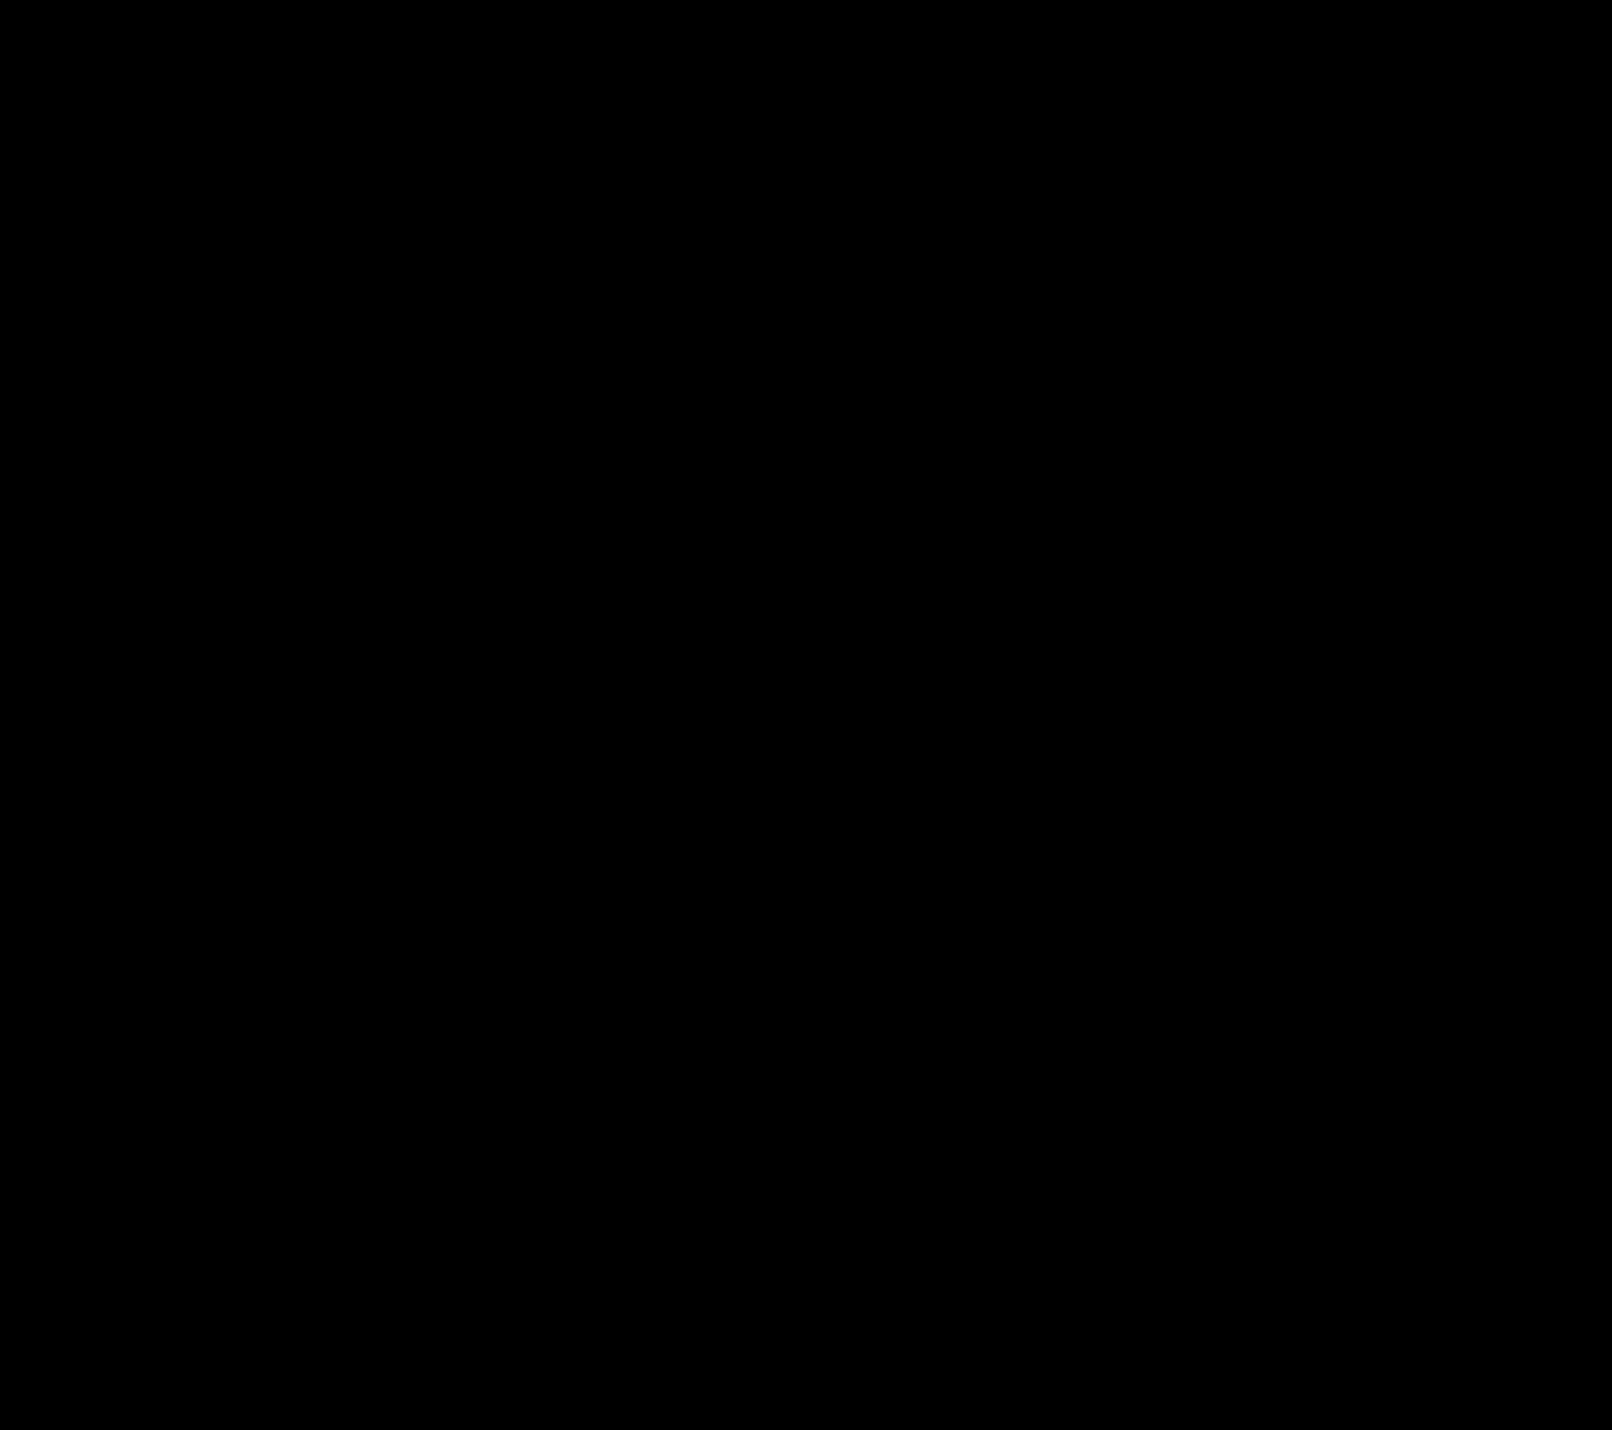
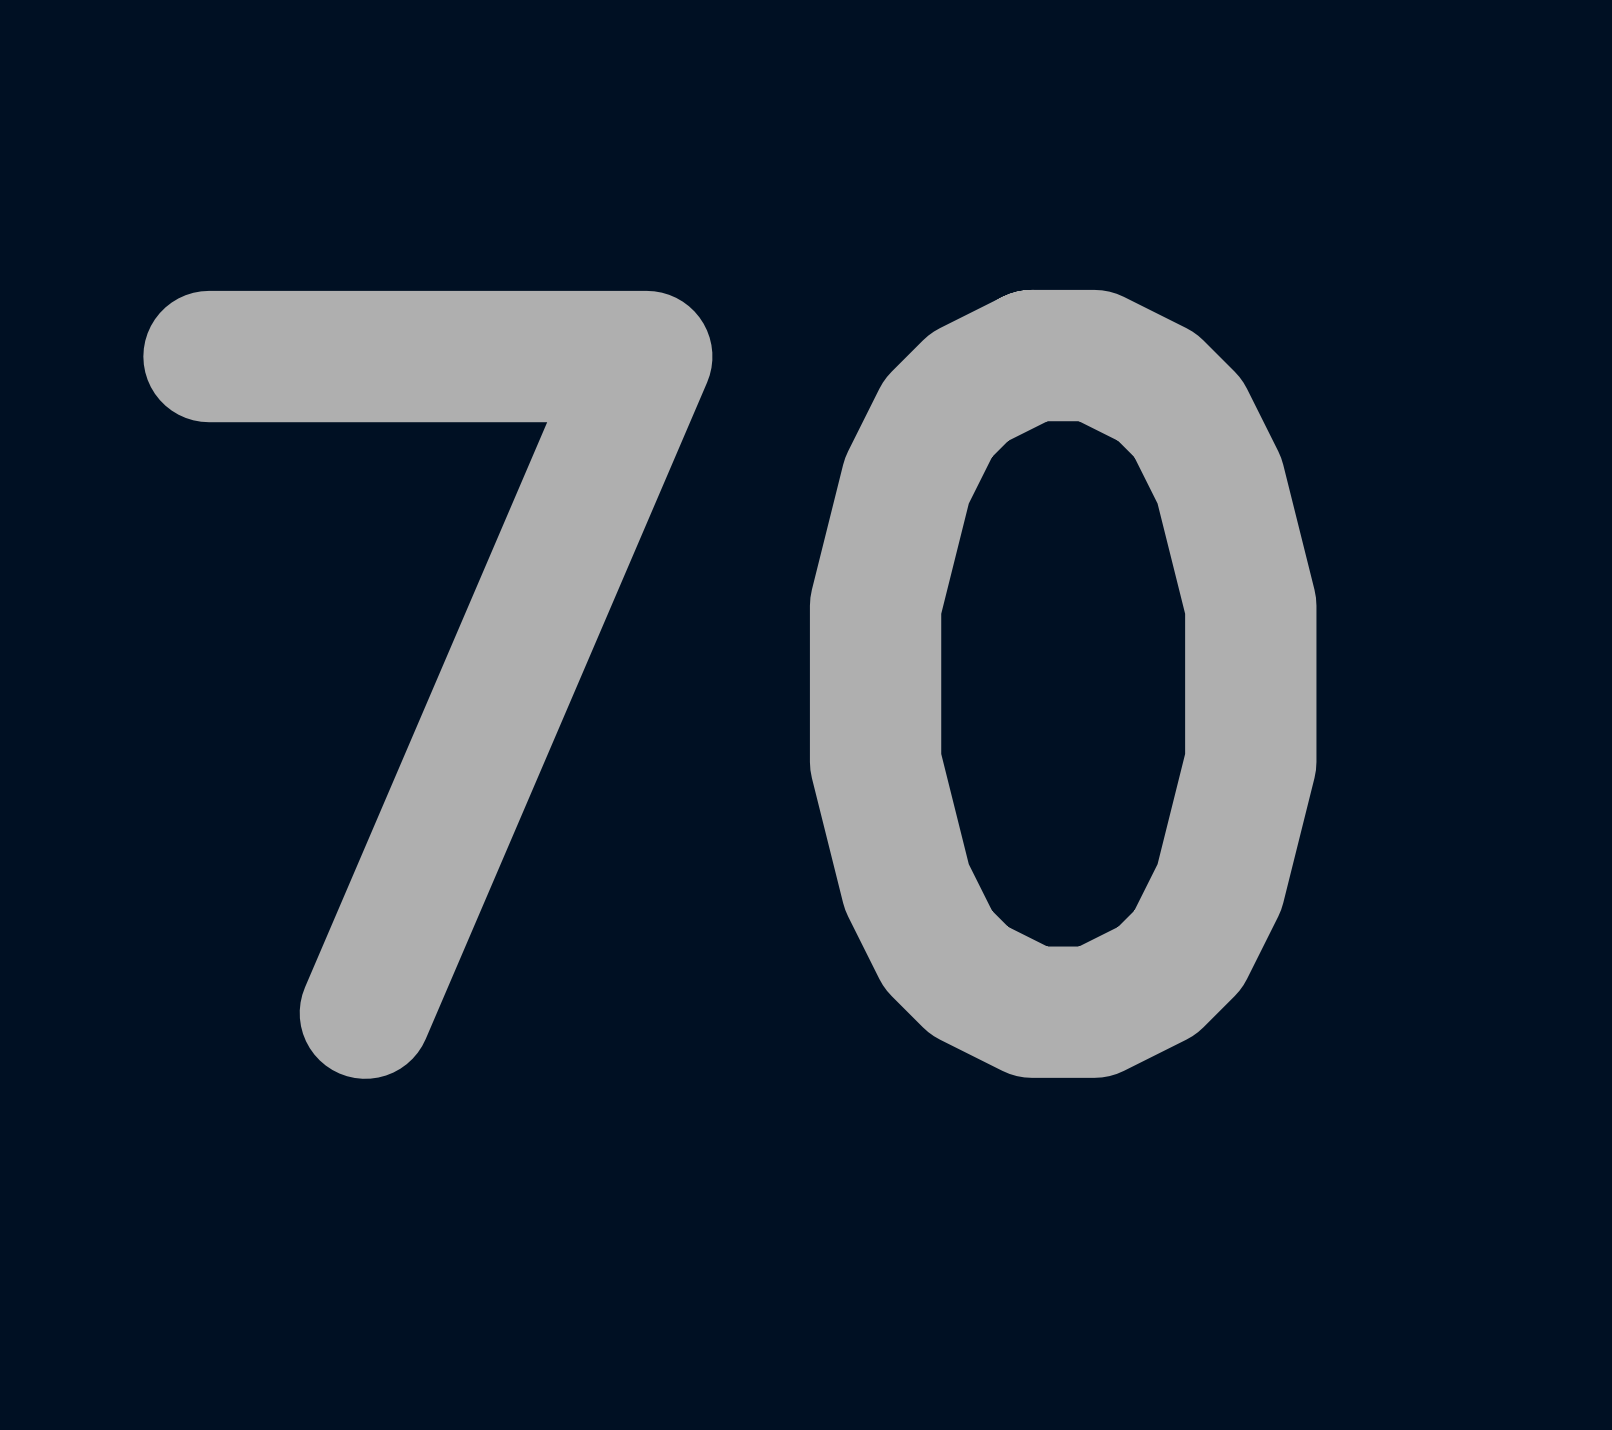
text: none -> 0 (1063, 683)
text: none -> 7 (427, 684)

